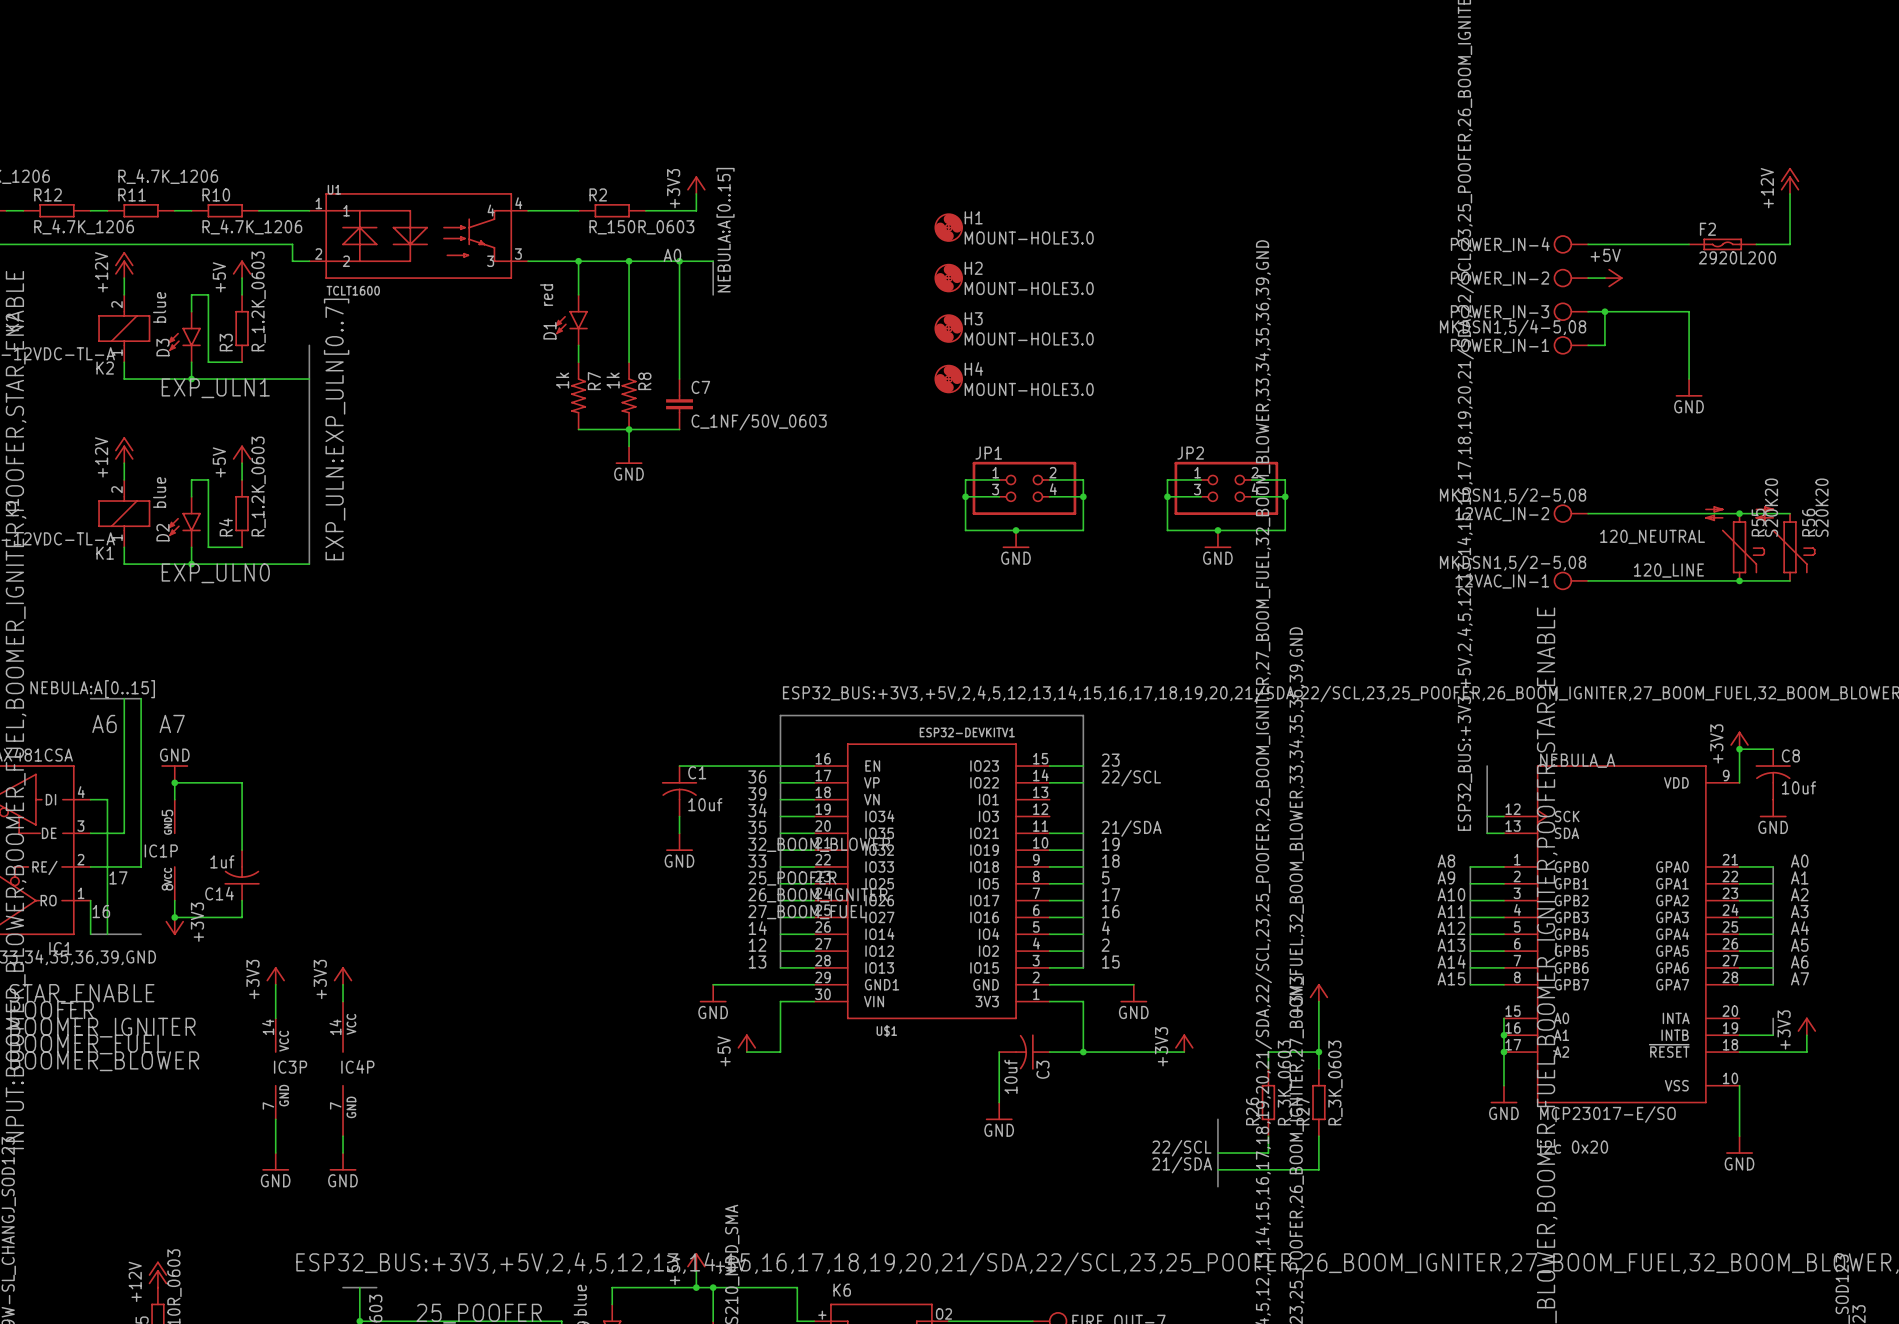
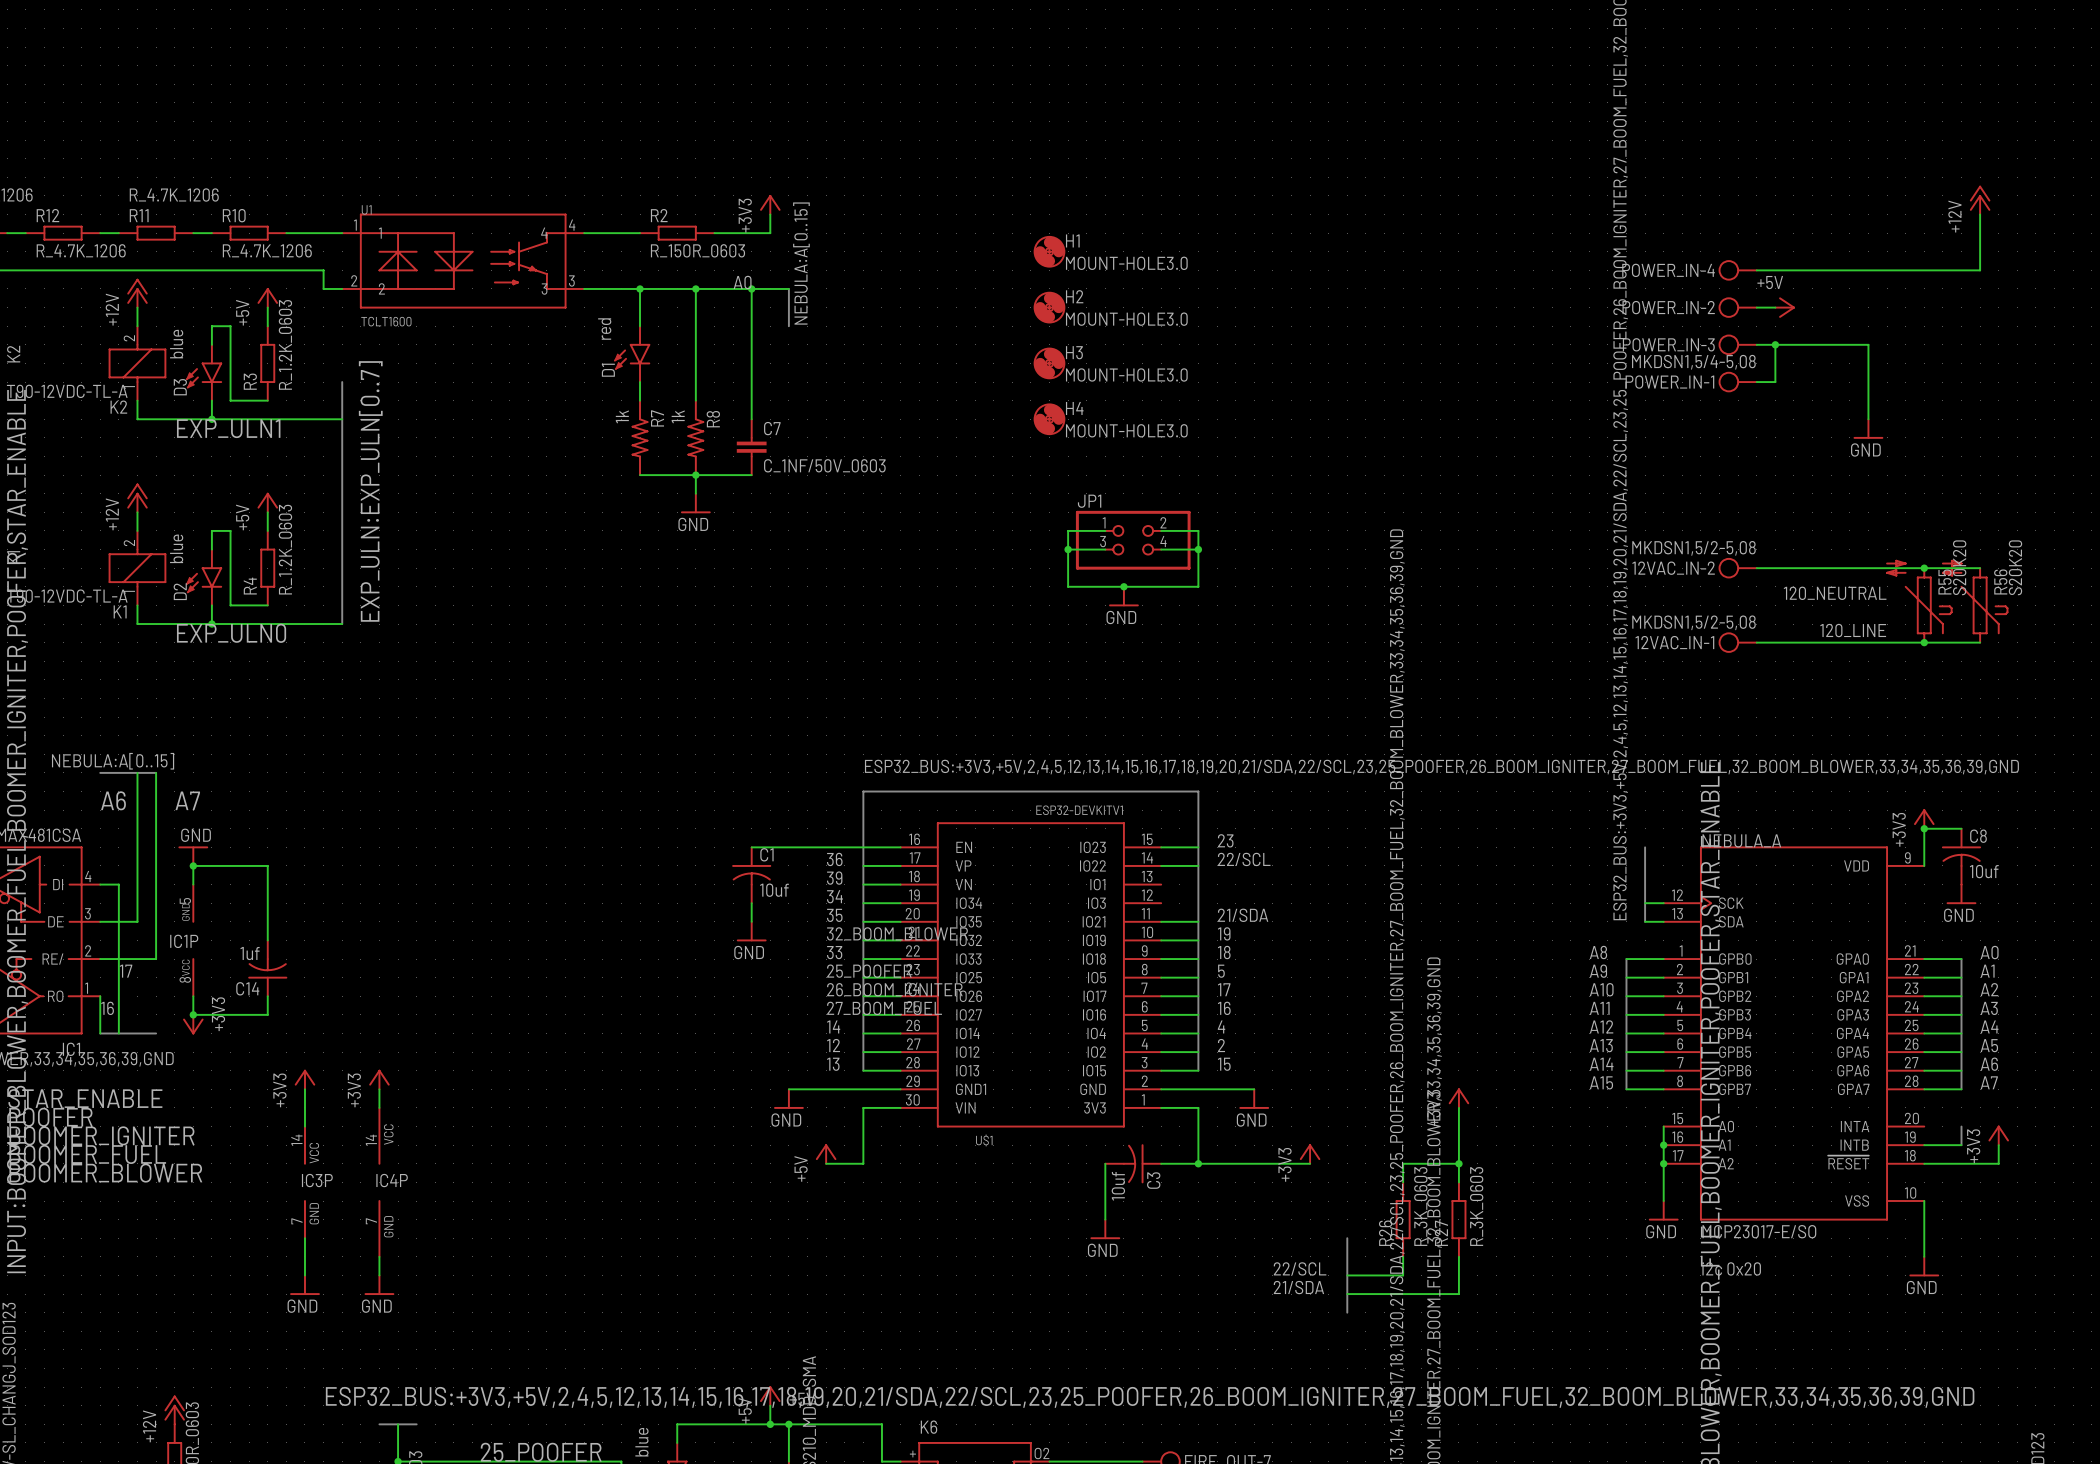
F2: 2920L200 (1722, 244) -> none
wire: (1201, 479) (1167, 479) (1167, 530) (1285, 530) (1285, 479) (1251, 479) -> none
JP2: (1226, 488) -> none
wire: (1167, 496) (1201, 496) -> none
junction: (1167, 496) -> none
wire: (1251, 496) (1285, 496) -> none
junction: (1285, 496) -> none
junction: (1217, 530) -> none
power symbol: GND (1217, 539) -> none

